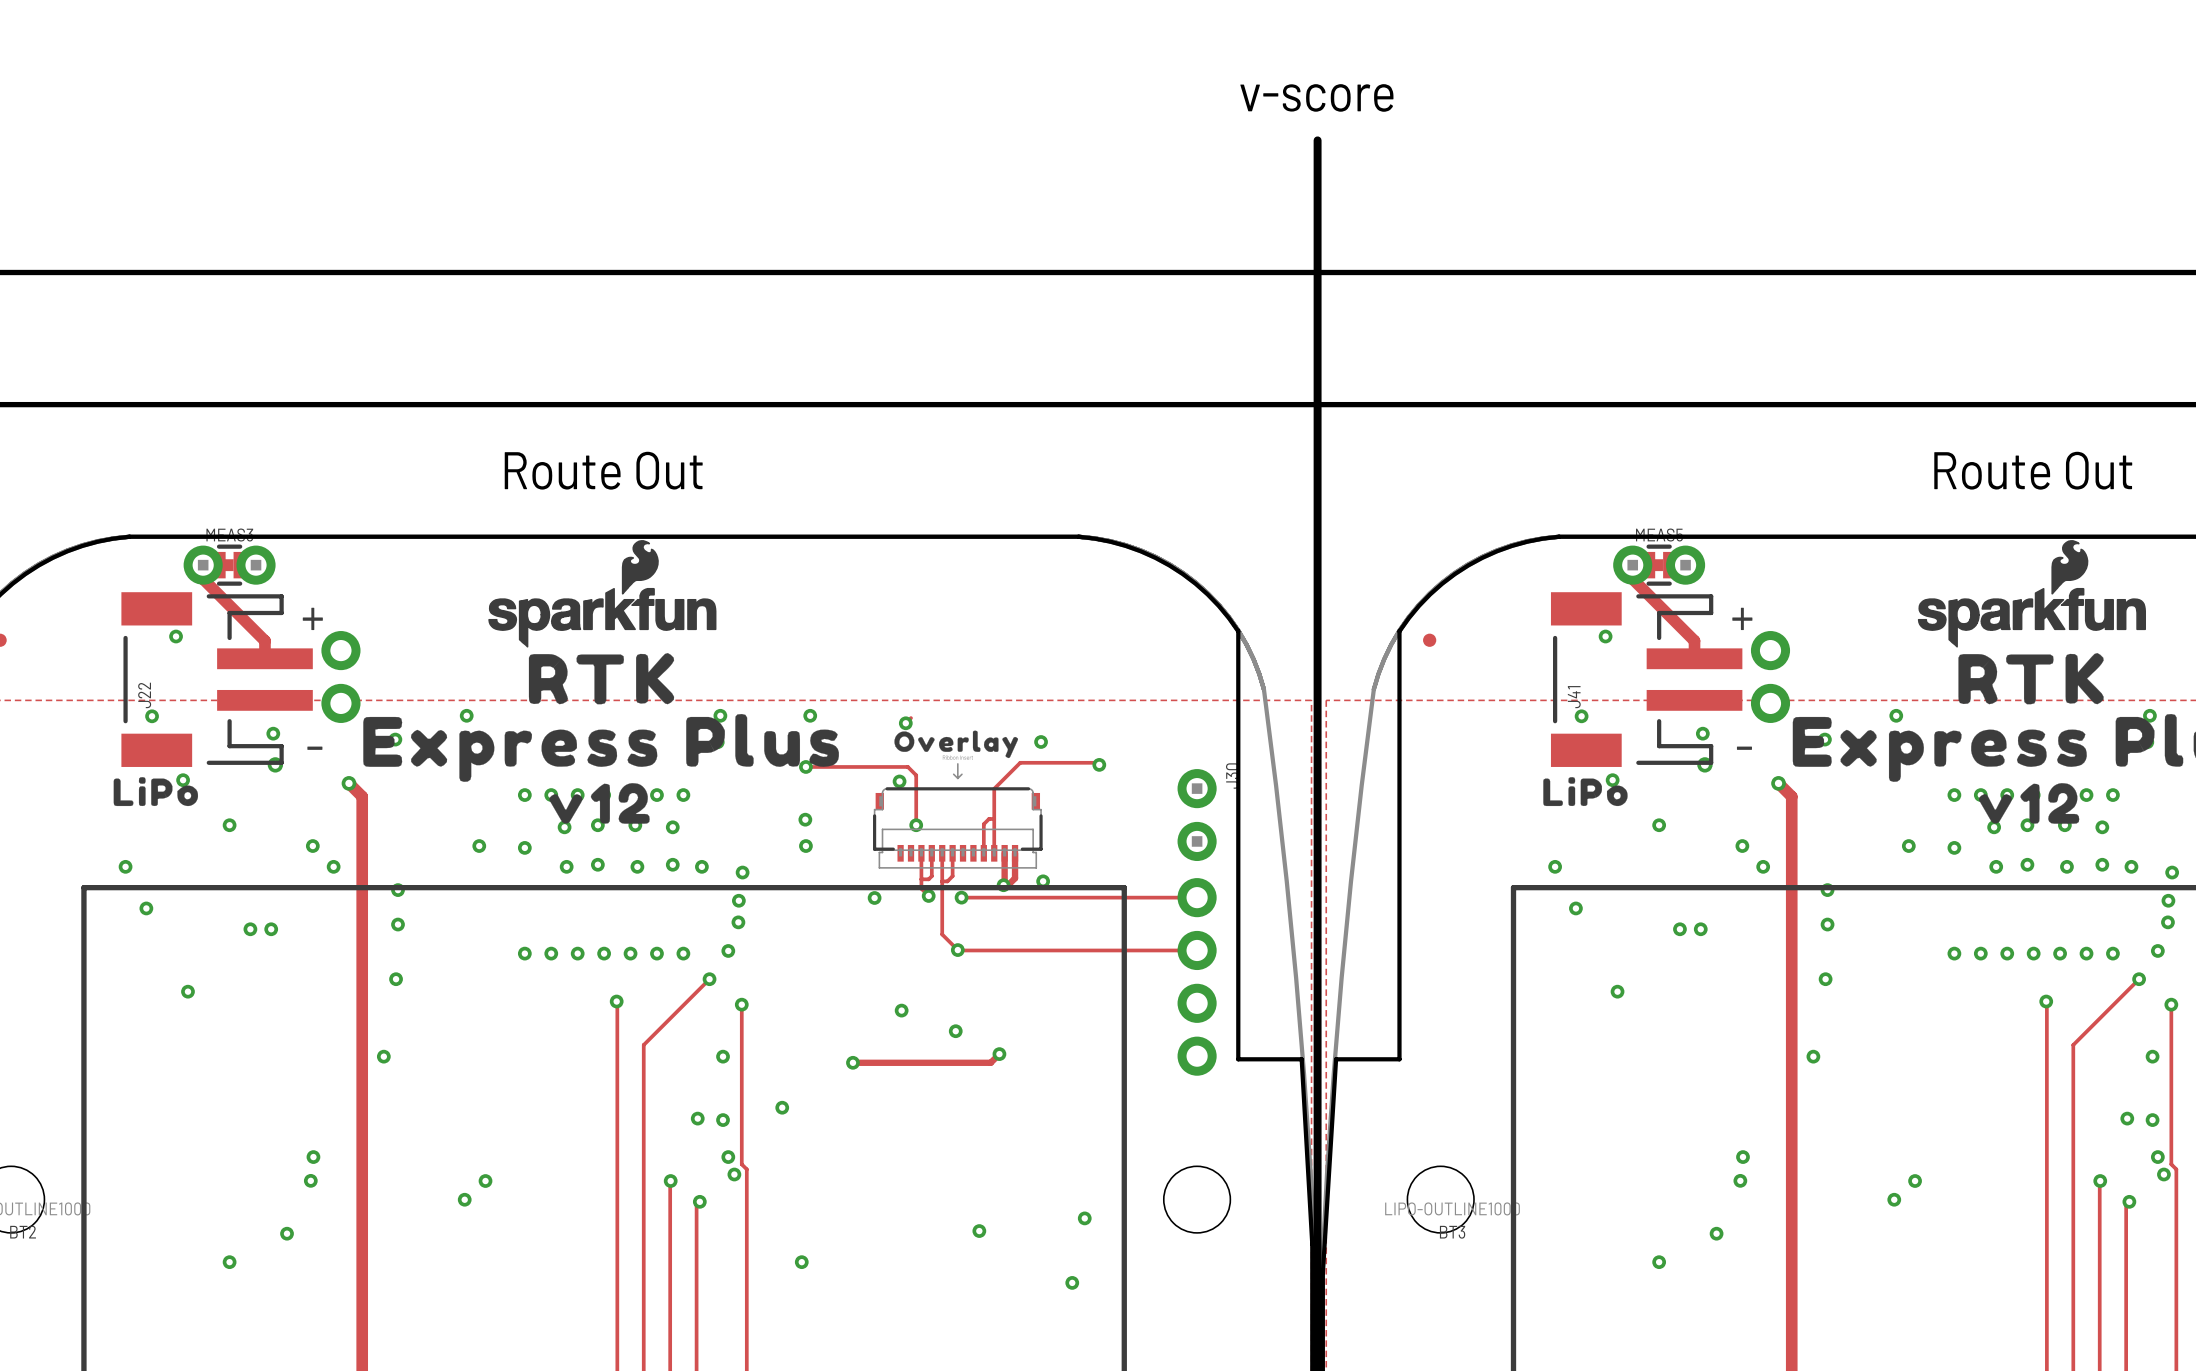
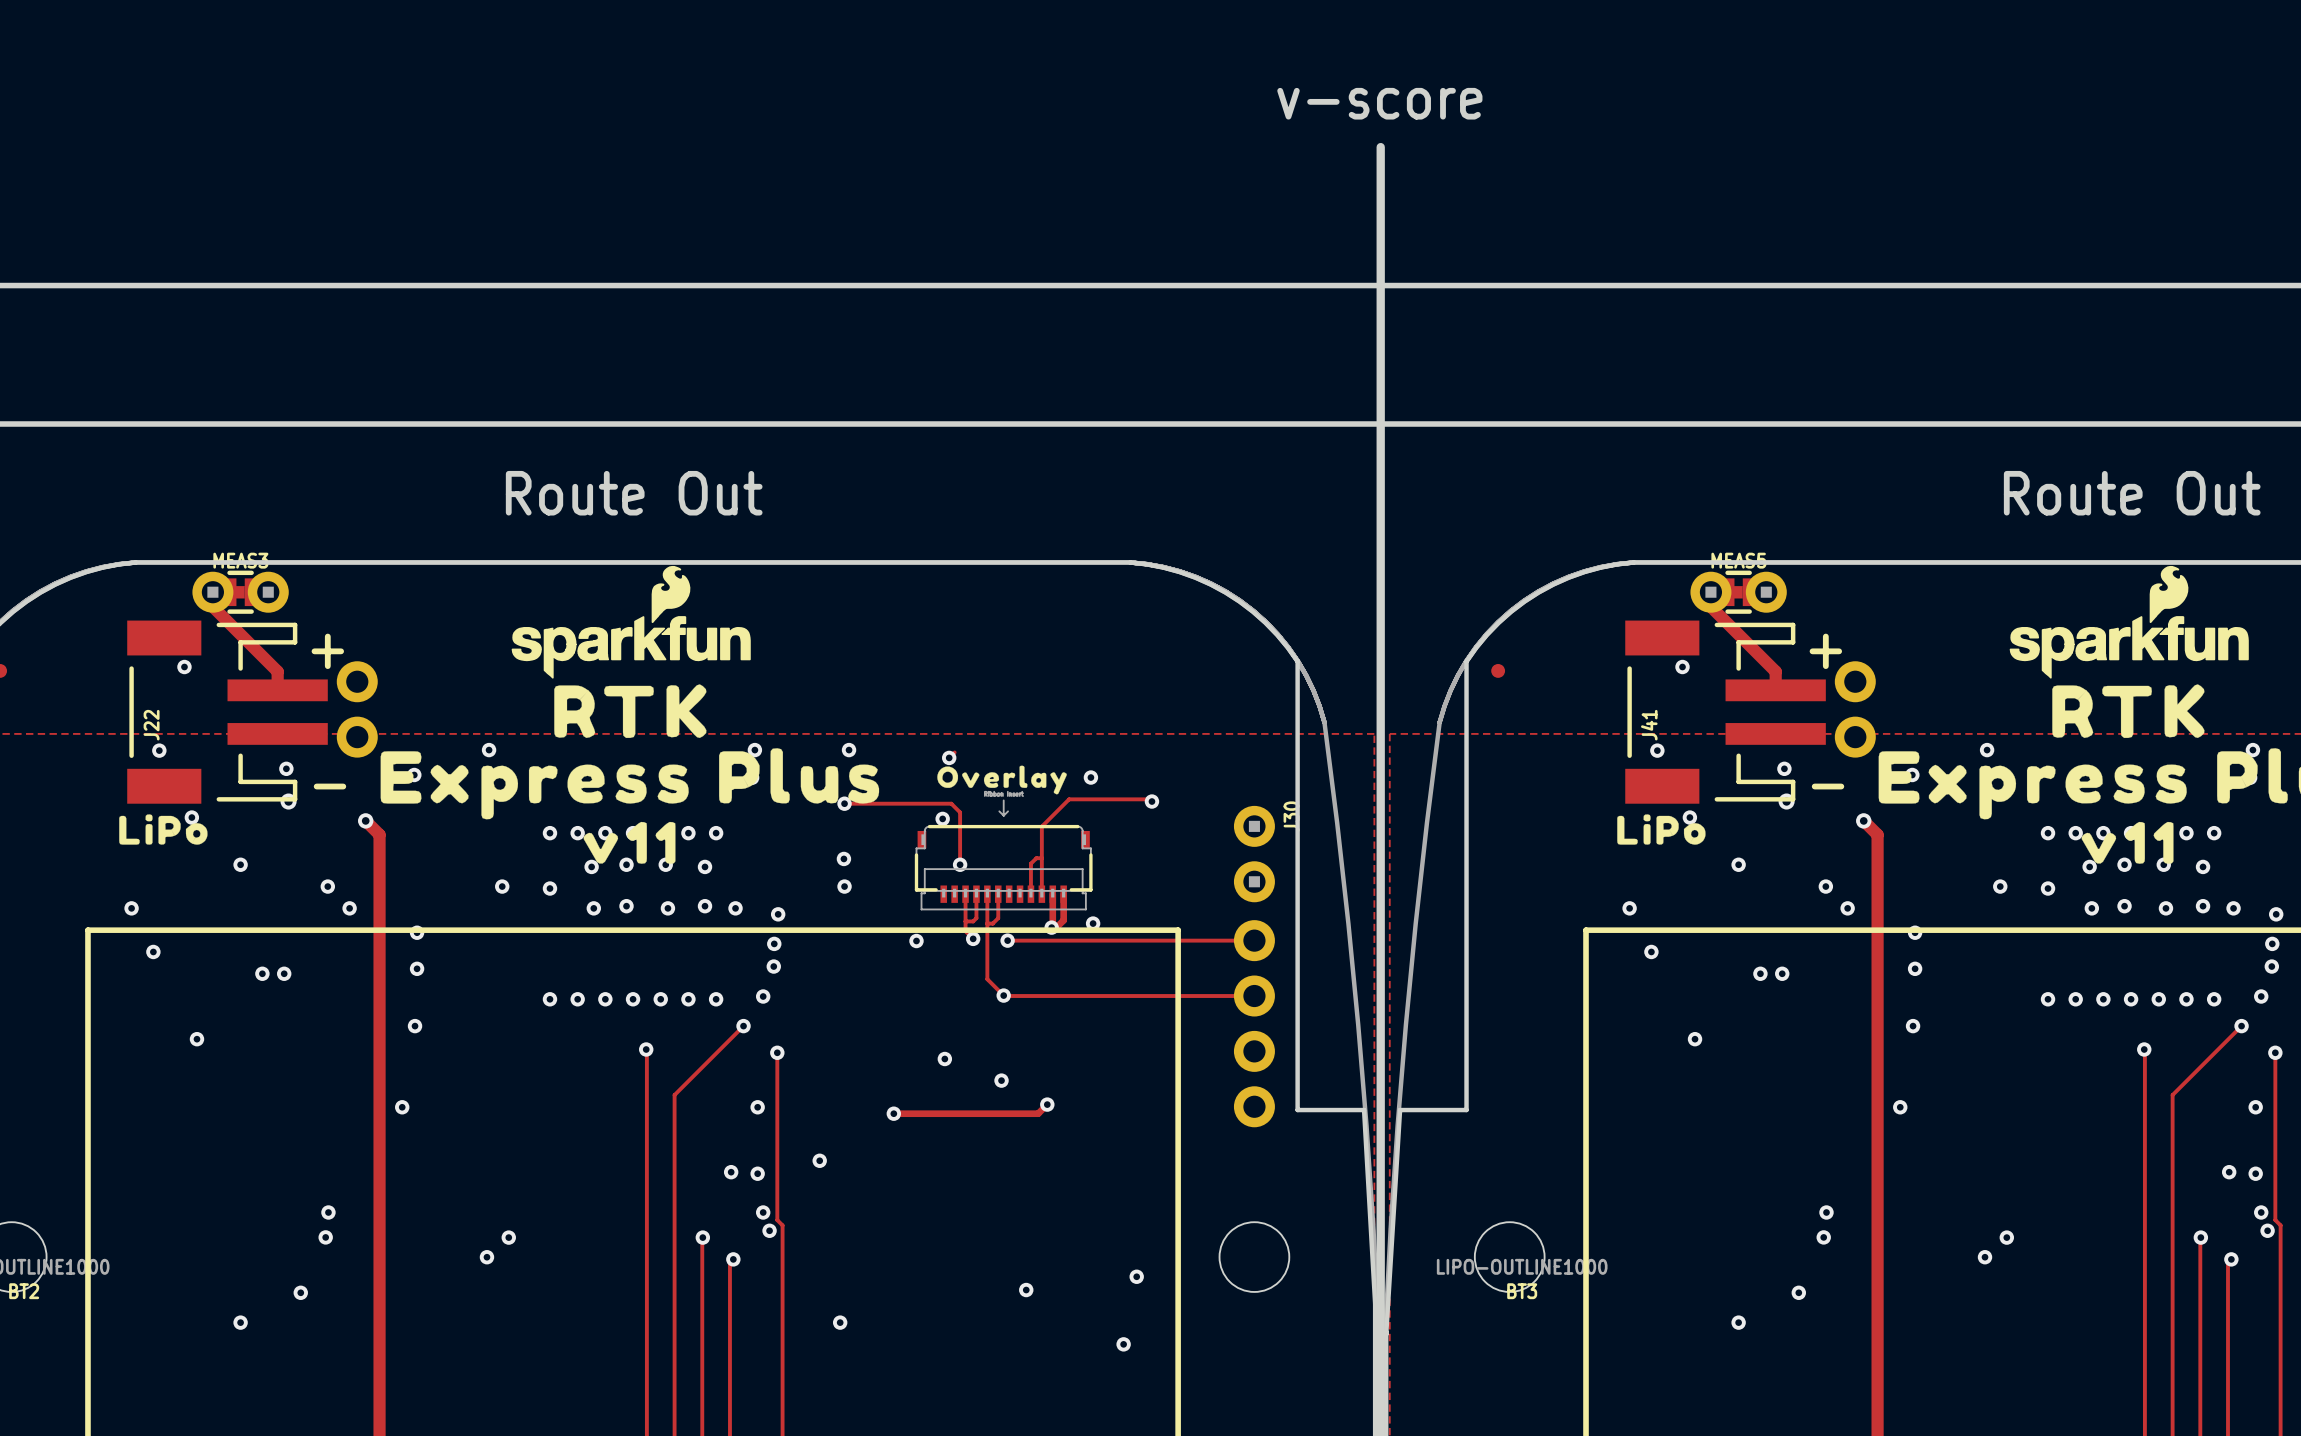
drawing shape: [549, 783, 650, 824] -> [583, 821, 676, 864]
drawing shape: [1978, 783, 2080, 824] -> [2081, 821, 2174, 864]

